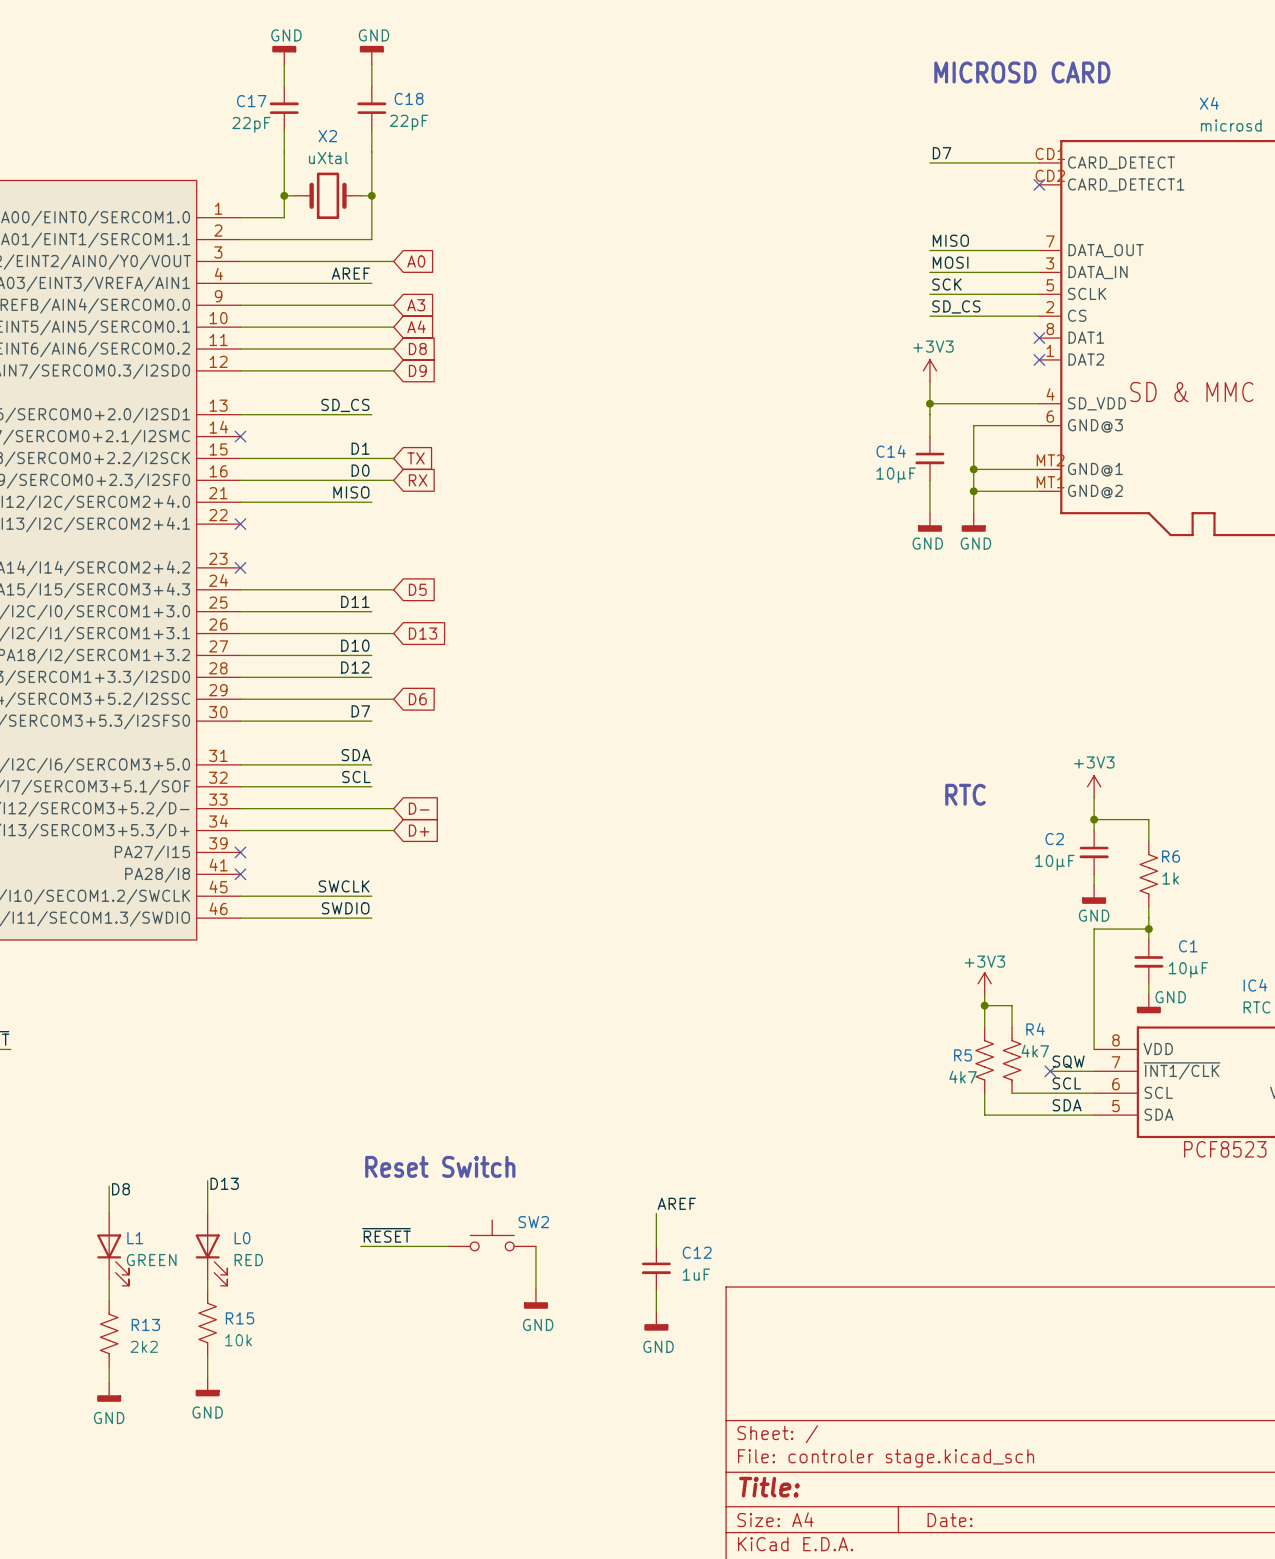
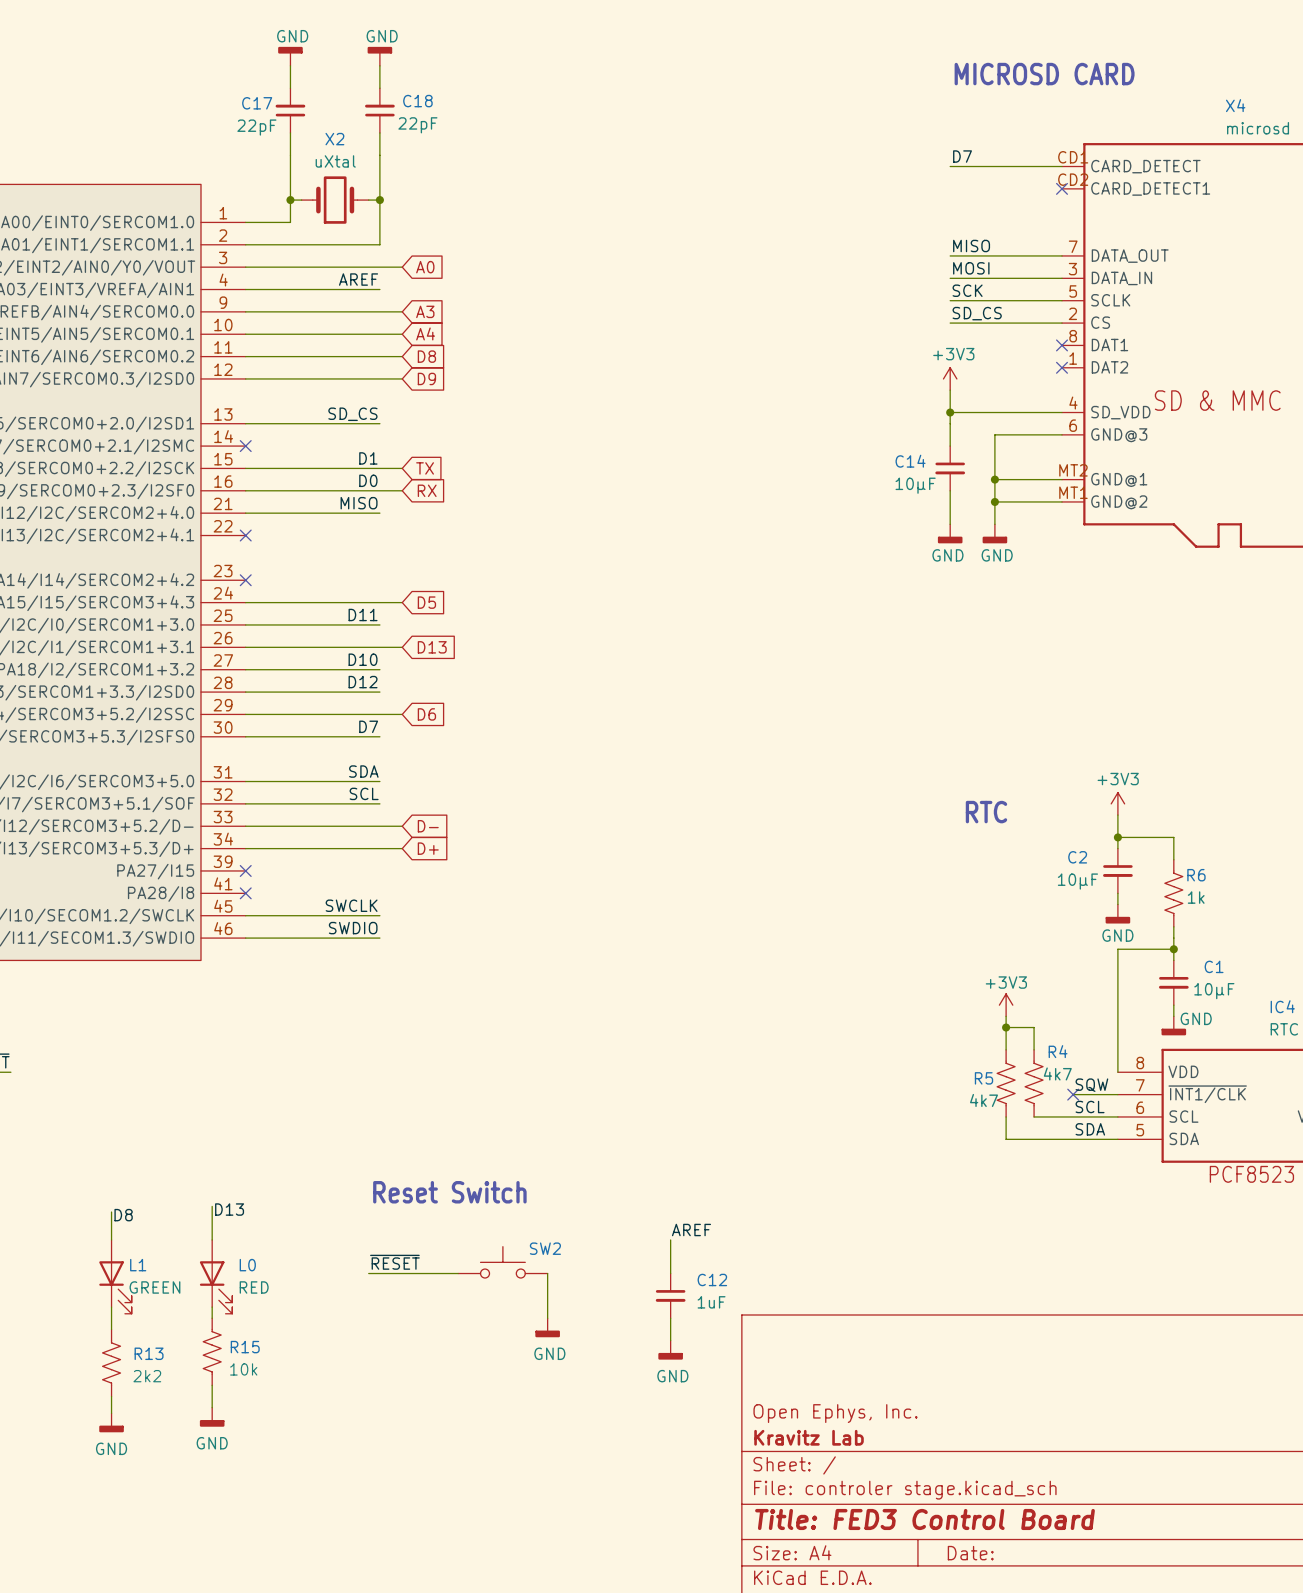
title block: none -> Open Ephys, Inc. (835, 1413)
title block: none -> Kravitz Lab (809, 1437)
title block: Title: (769, 1487) -> Title: FED3 Control Board (924, 1519)

